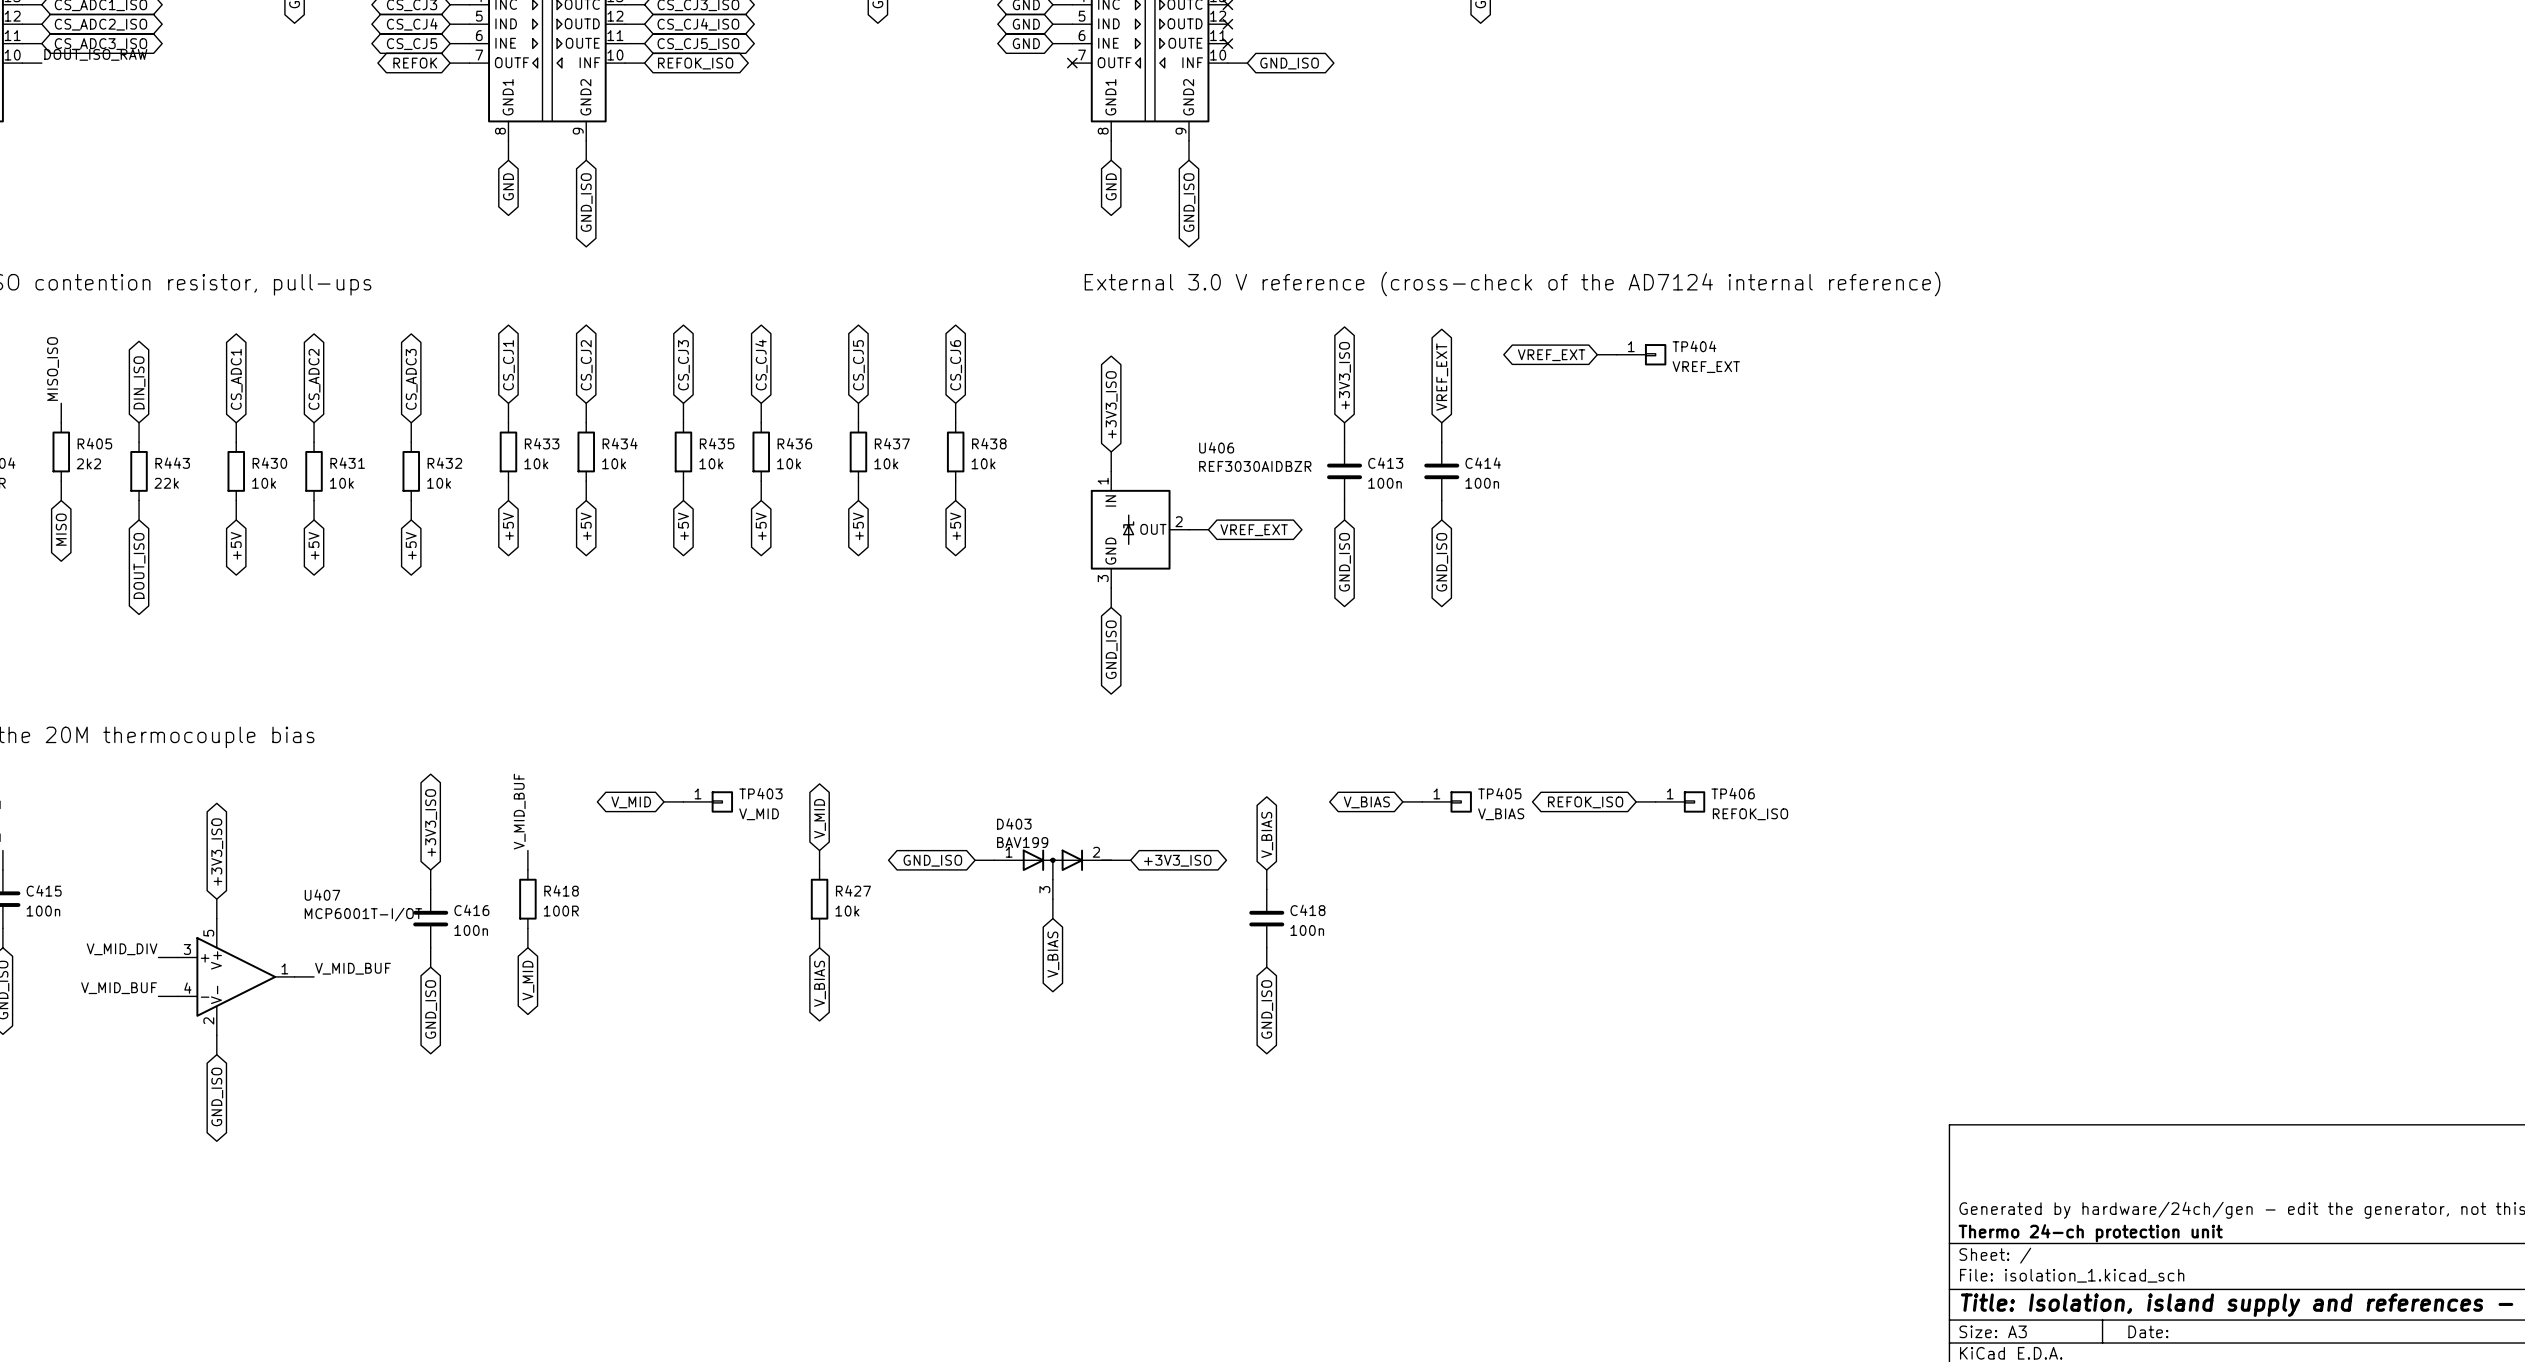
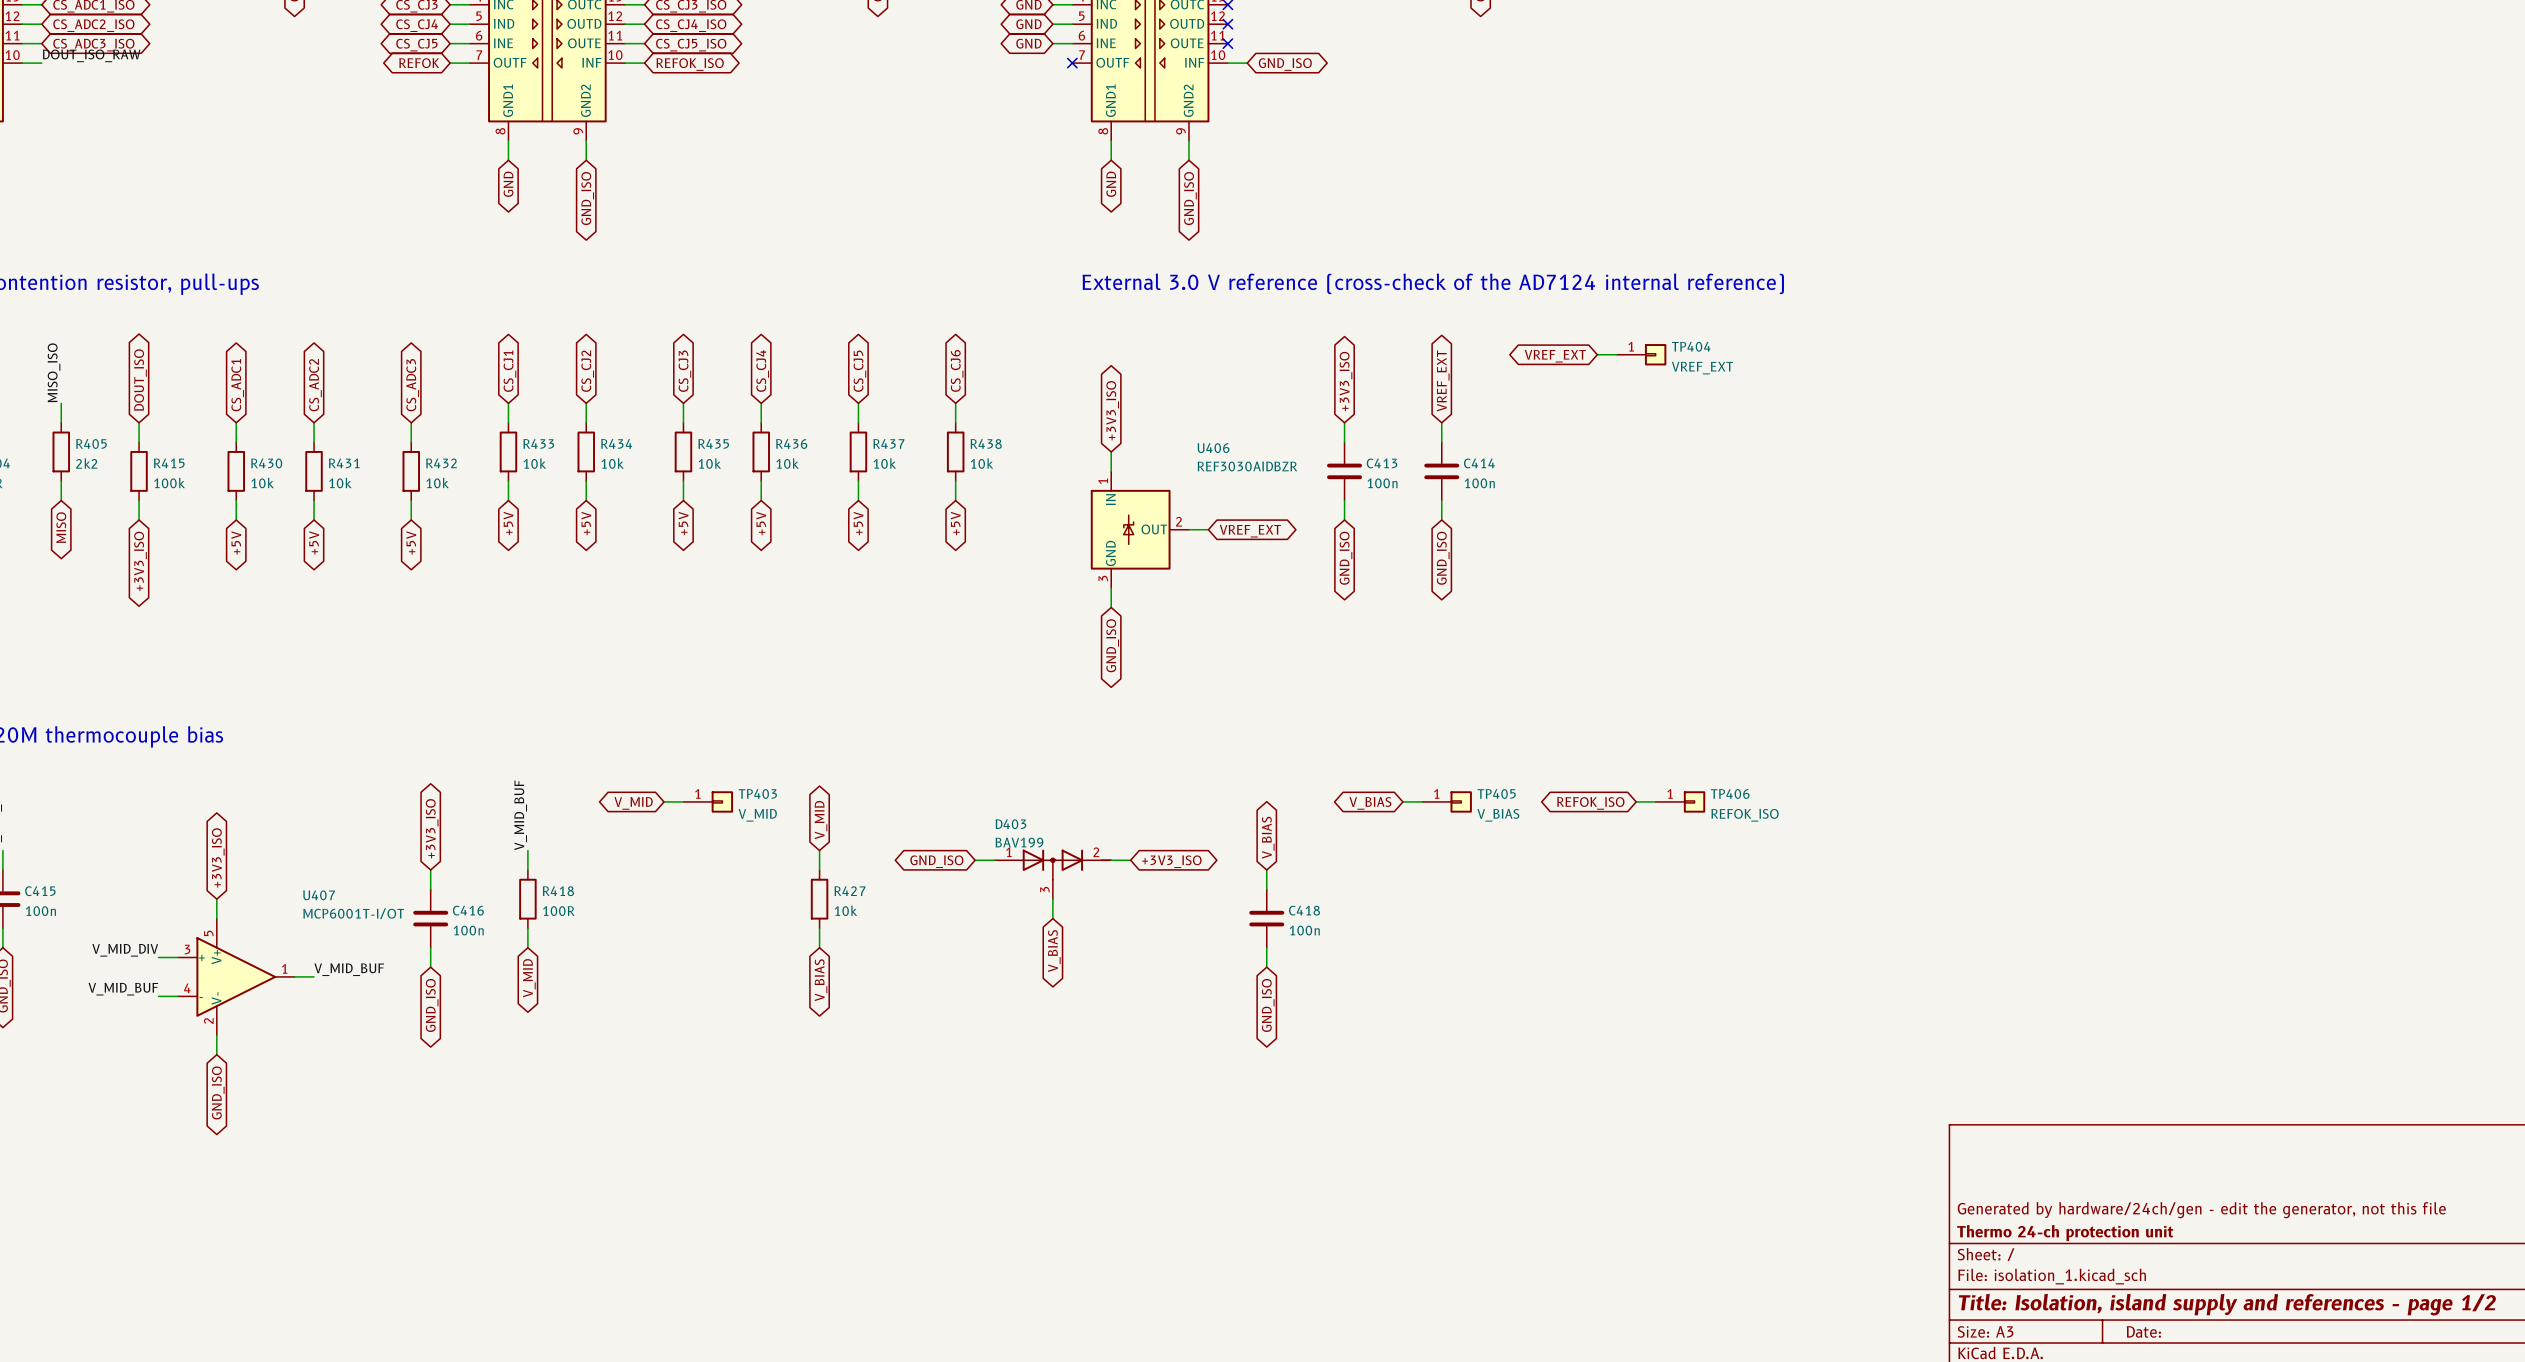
global label: DIN_ISO (139, 382) -> DOUT_ISO (140, 380)
R443 name: R443 (172, 463) -> R415 (169, 463)
R443 value: 22k (166, 483) -> 100k (169, 483)
global label: DOUT_ISO (139, 565) -> +3V3_ISO (140, 561)

